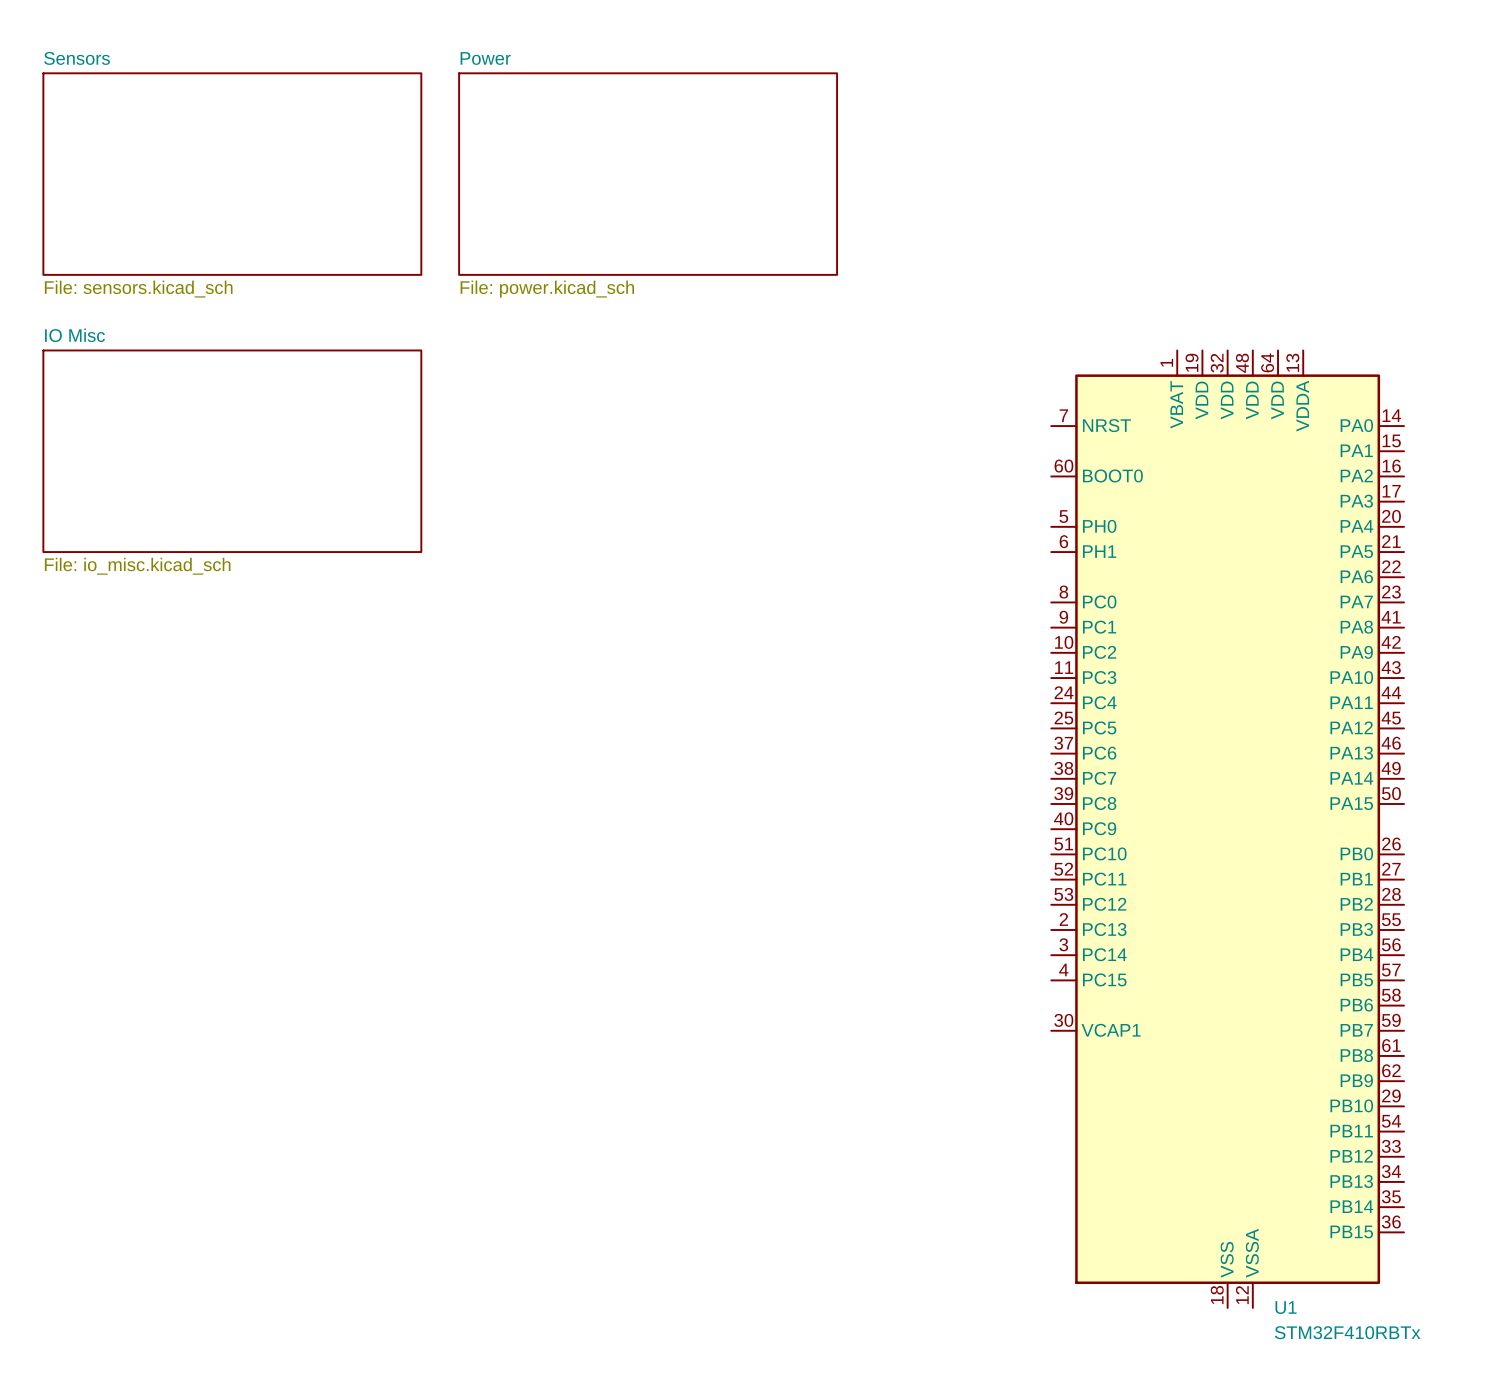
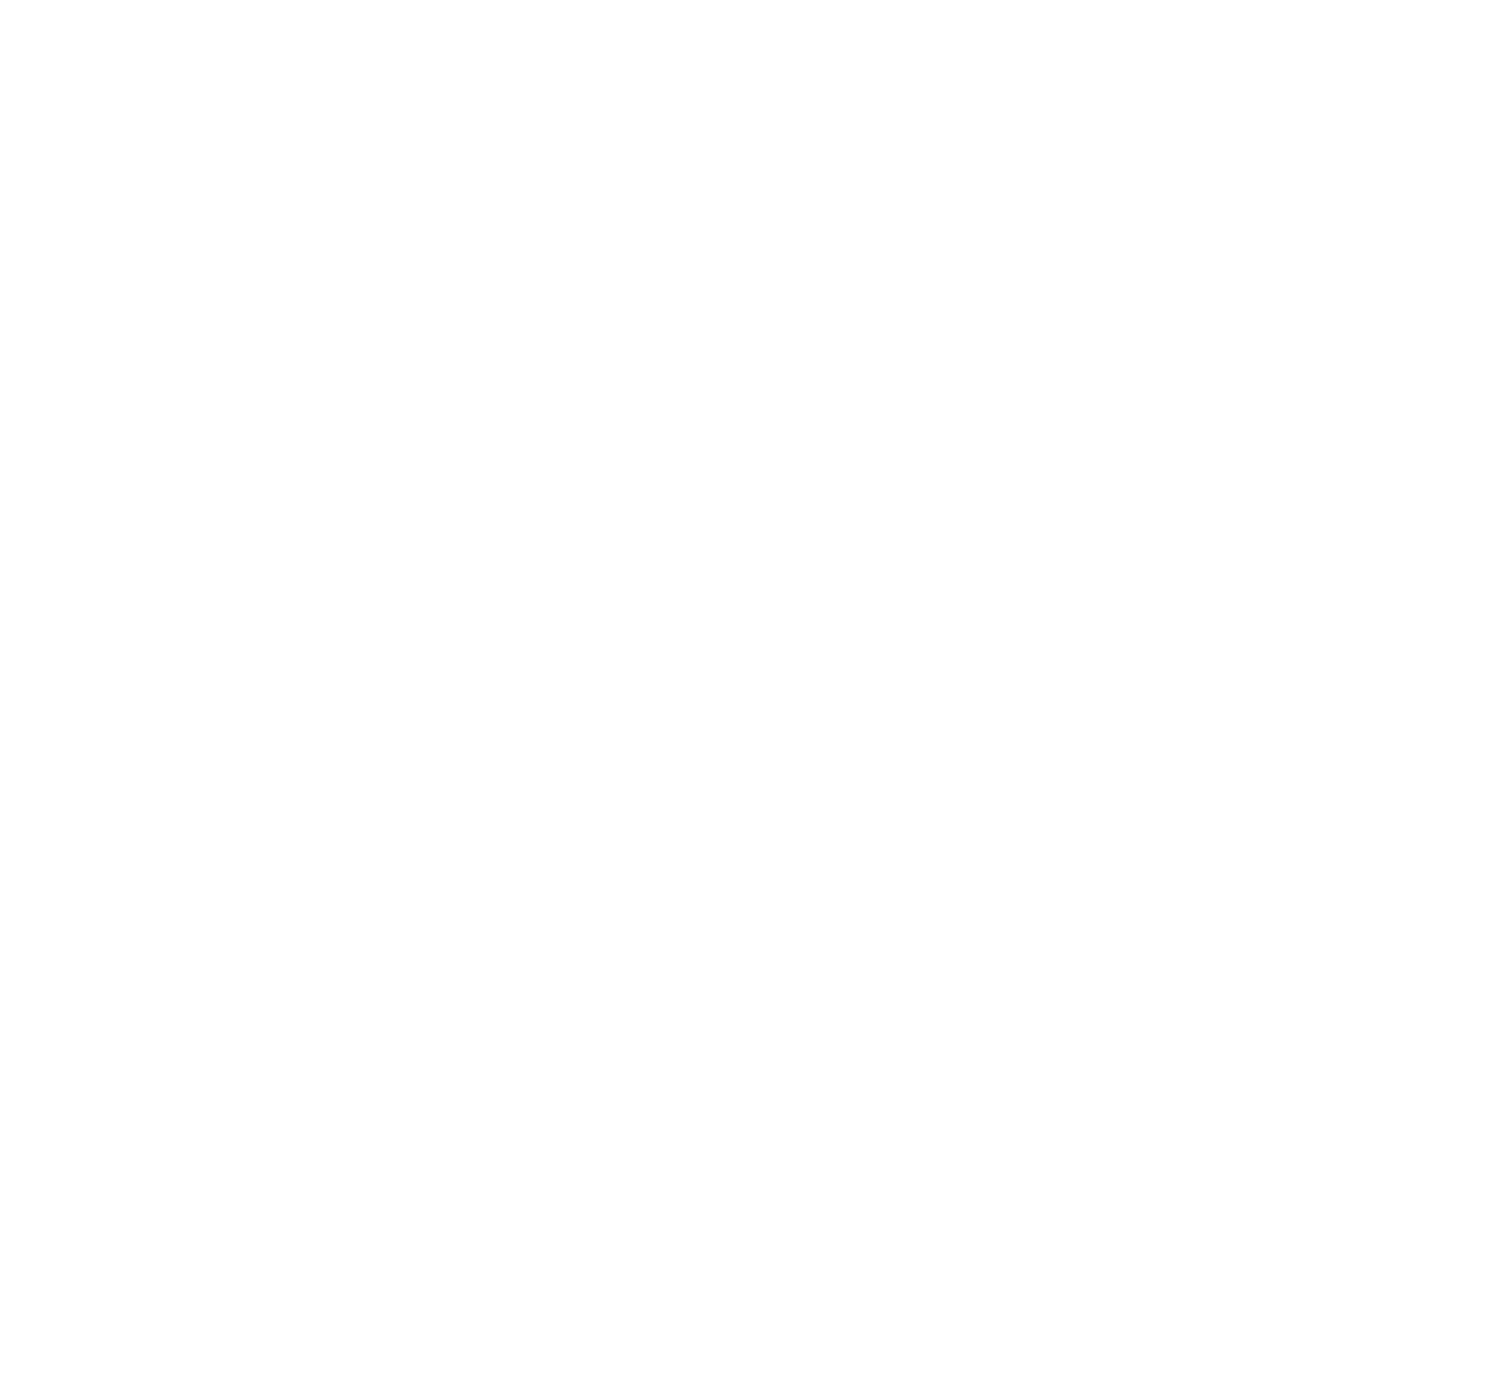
sheet Sensors: File: sensors.kicad_sch (232, 174) -> none
sheet Power: File: power.kicad_sch (648, 174) -> none
sheet IO Misc: File: io_misc.kicad_sch (232, 451) -> none
U1: STM32F410RBTx (1227, 829) -> none

